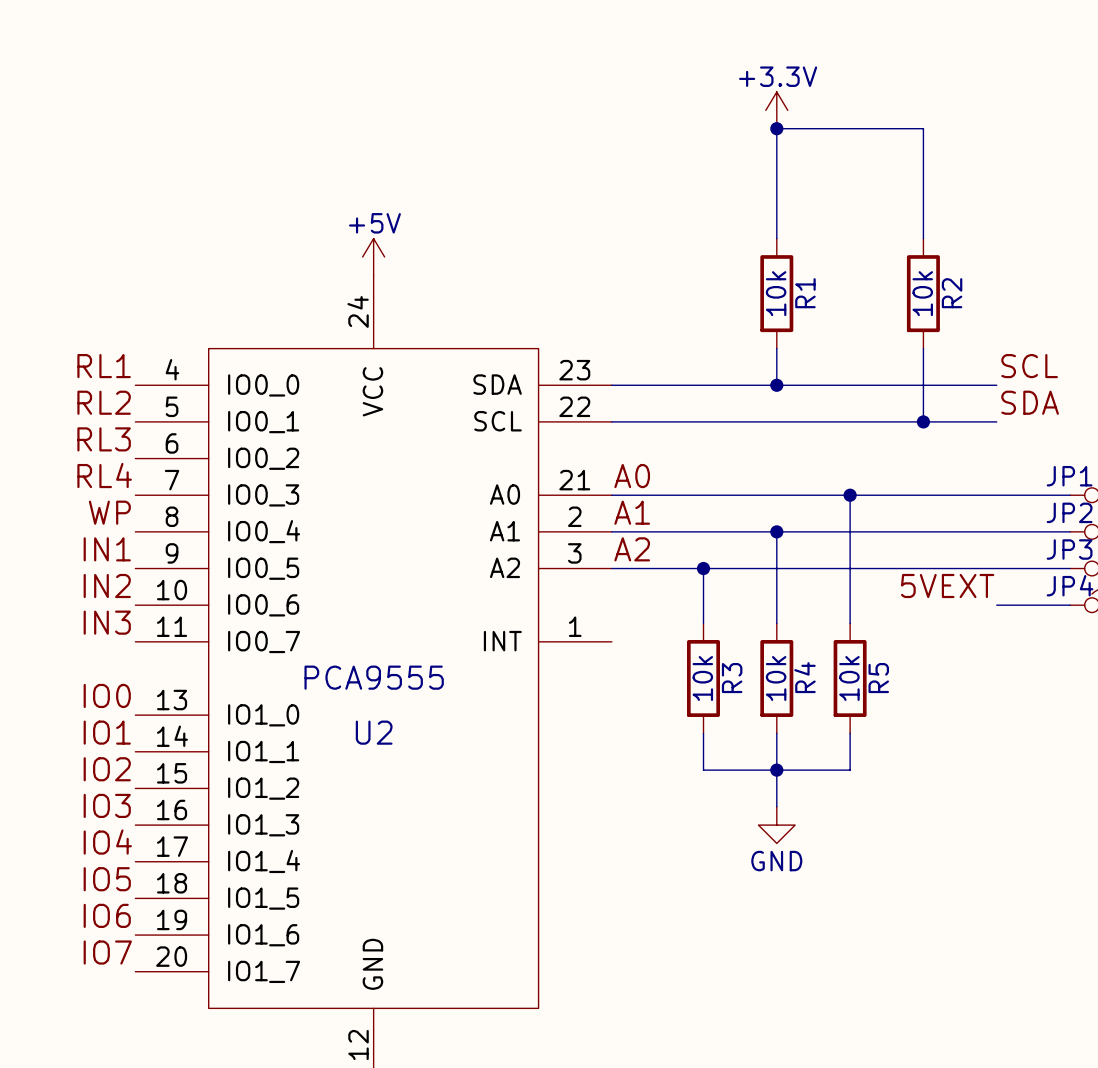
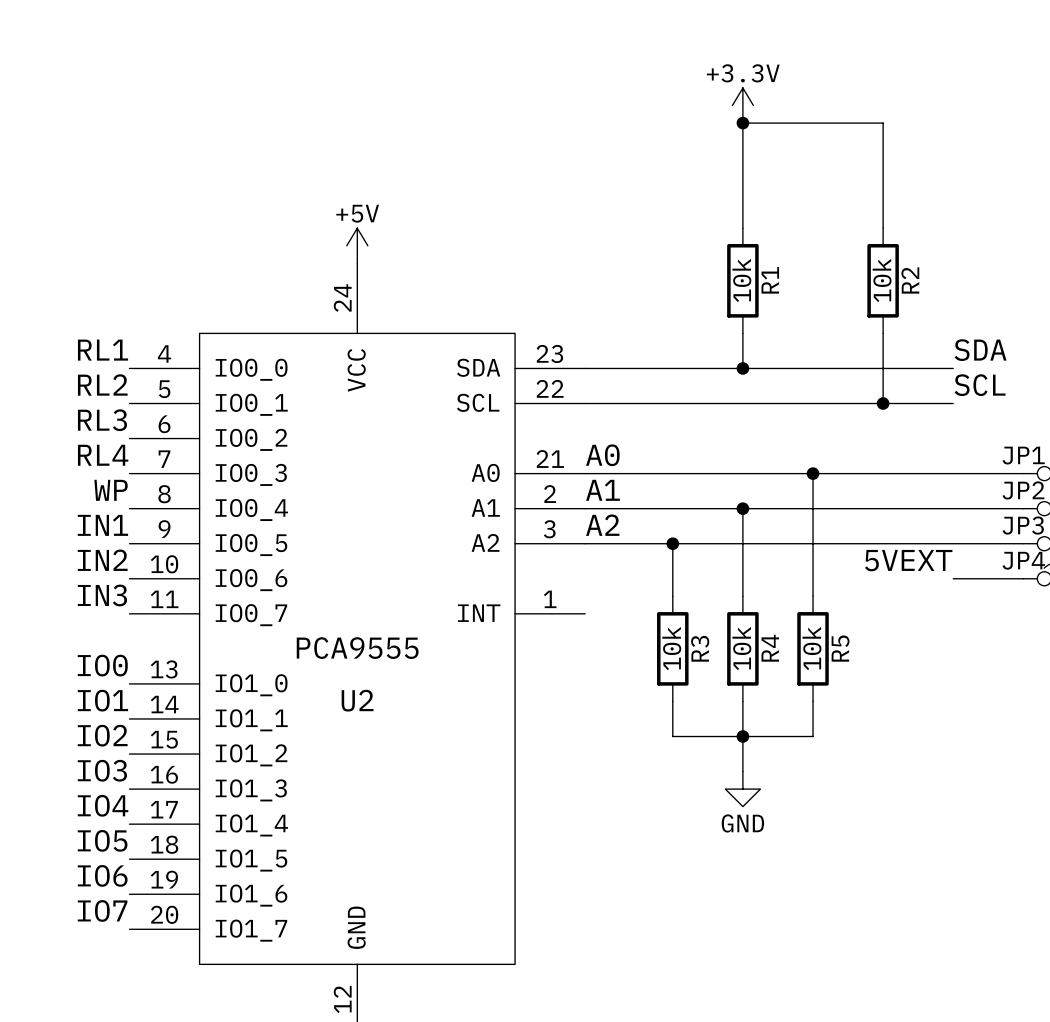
label: SCL (1029, 366) -> SDA (980, 350)
label: SDA (1030, 402) -> SCL (980, 385)

